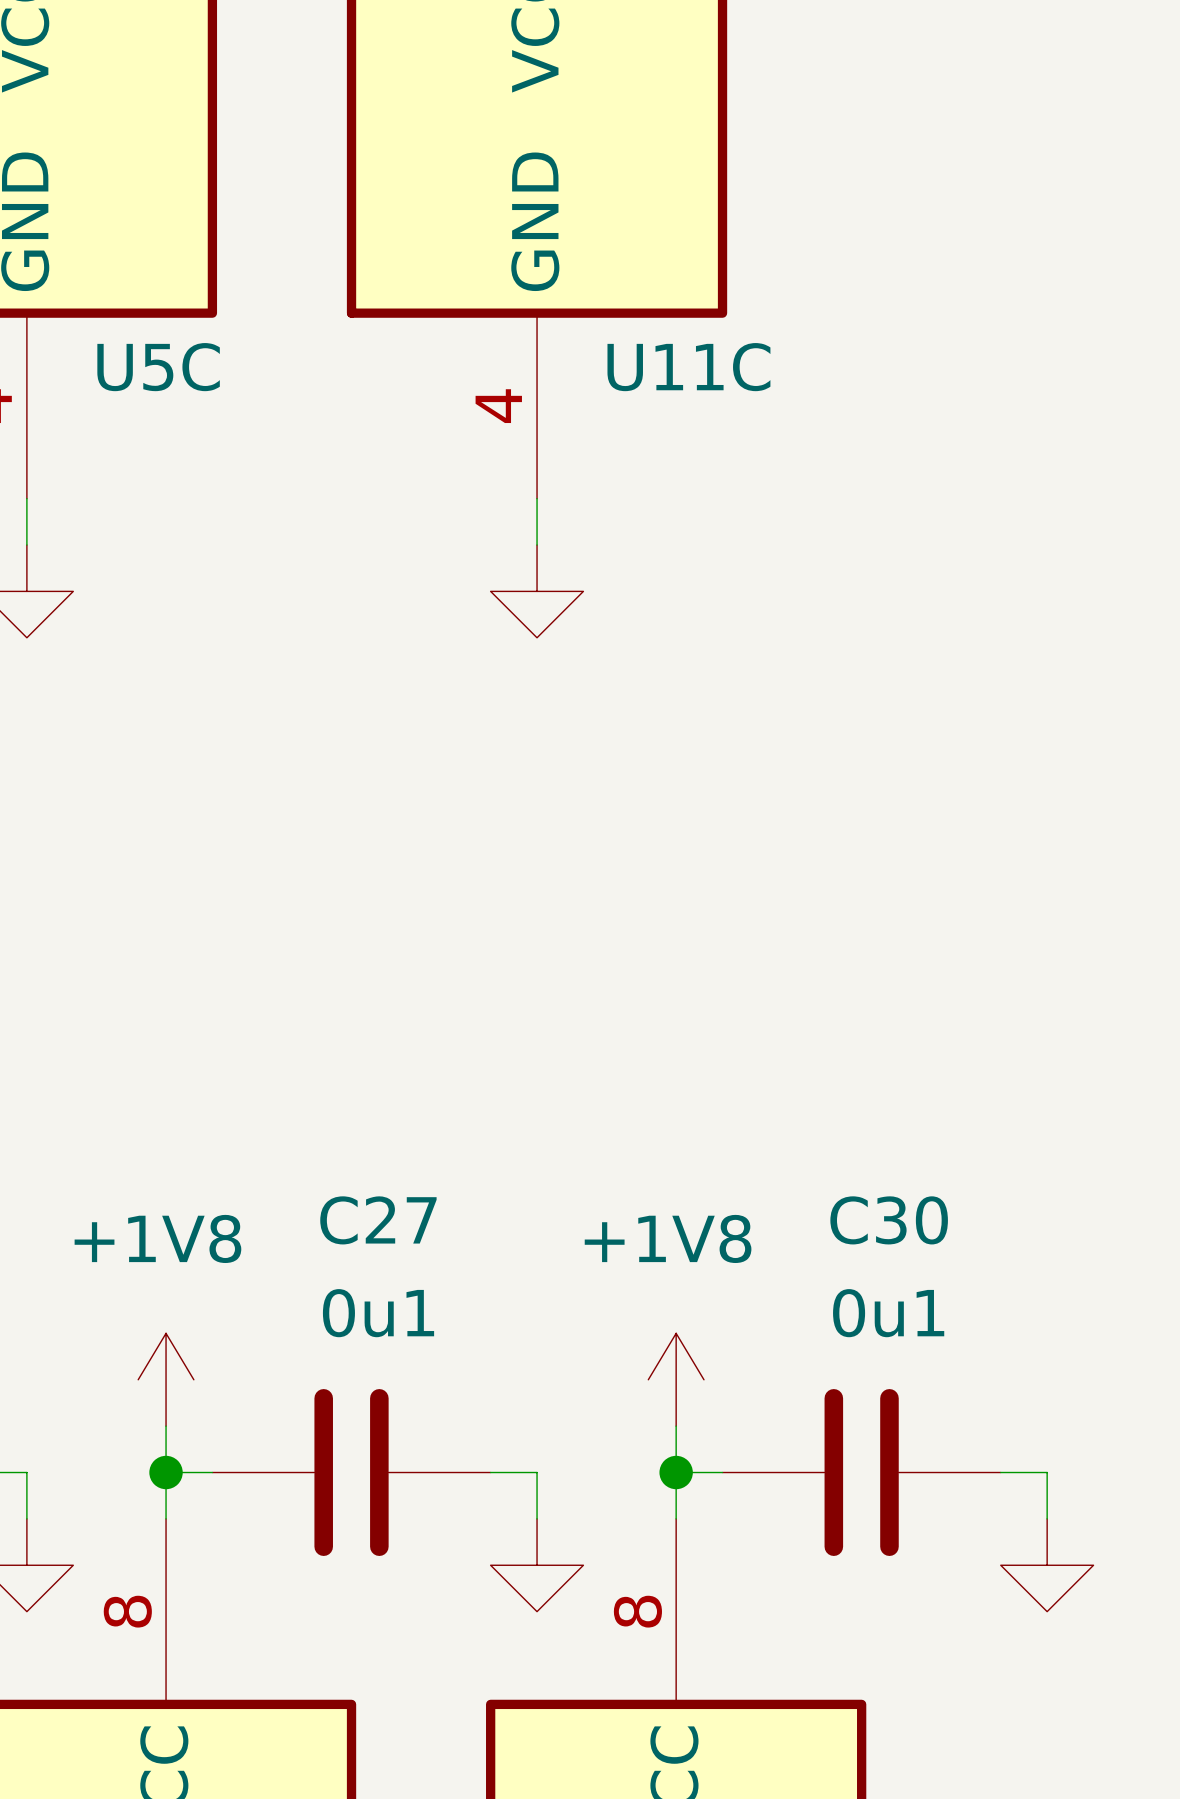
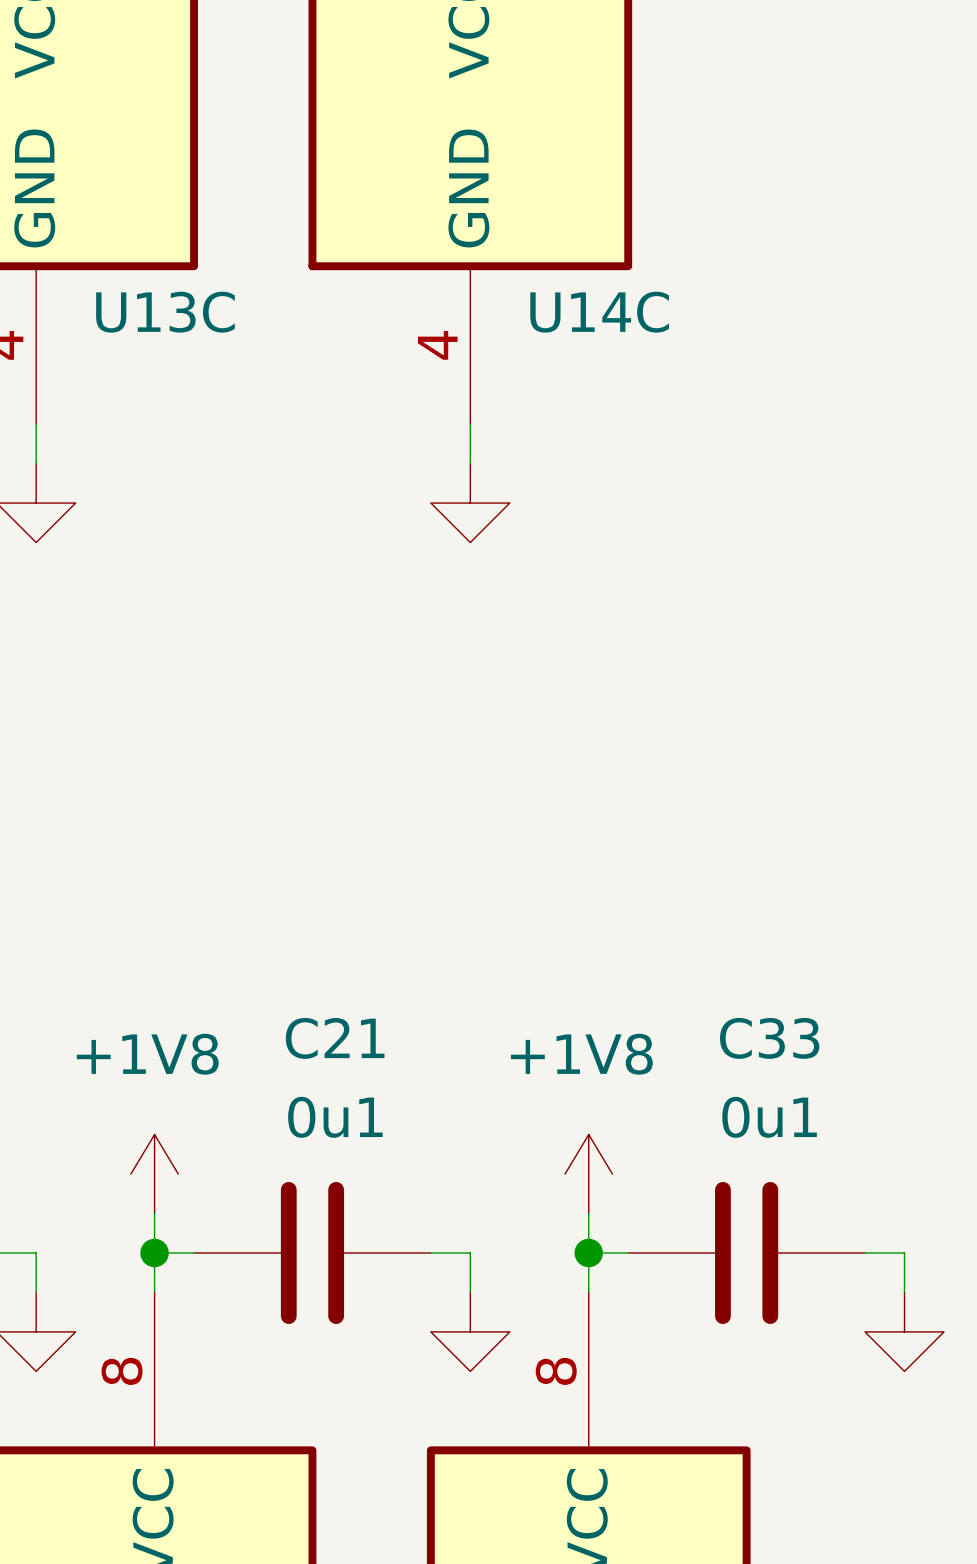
U5C name: U5C (158, 367) -> U13C (165, 312)
U11C name: U11C (688, 367) -> U14C (599, 312)
C27 name: C27 (378, 1220) -> C21 (335, 1038)
C30 name: C30 (889, 1220) -> C33 (769, 1038)

